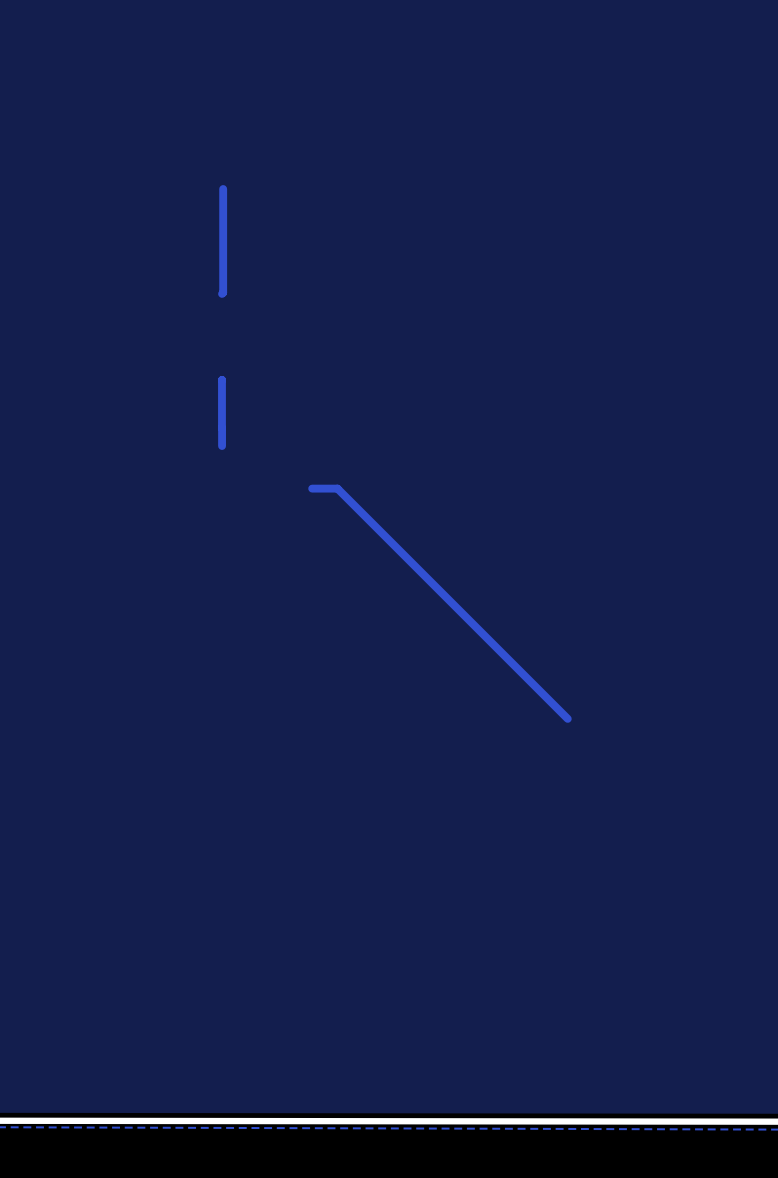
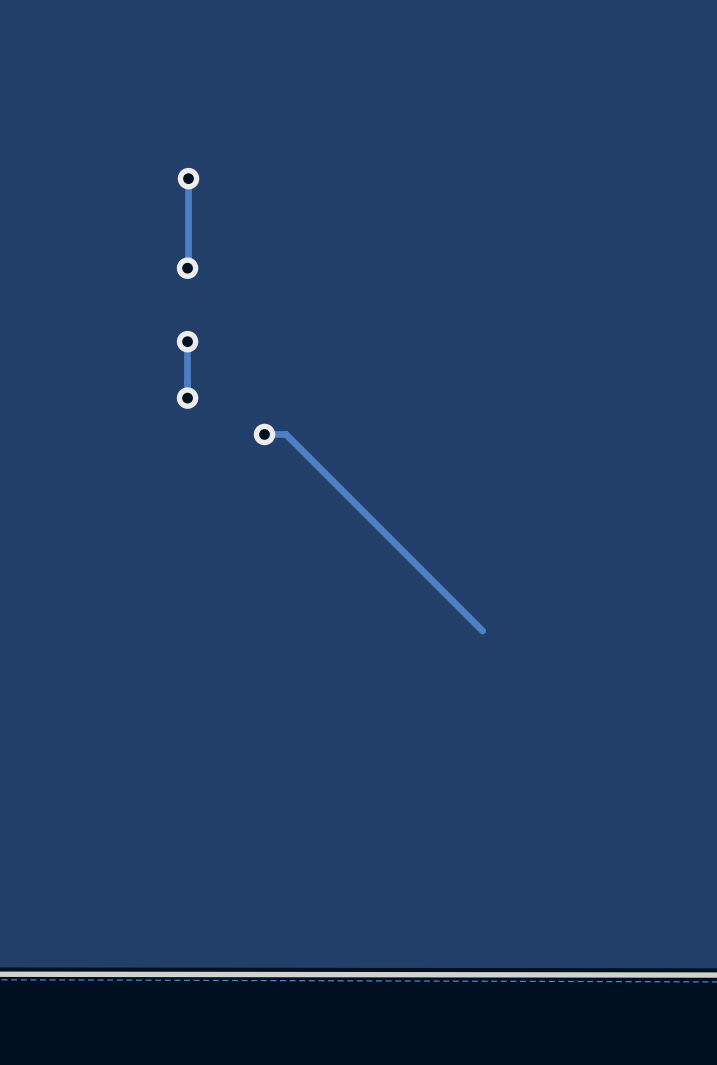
via: none -> (188, 178)
via: none -> (187, 268)
via: none -> (187, 341)
via: none -> (187, 398)
via: none -> (264, 434)

